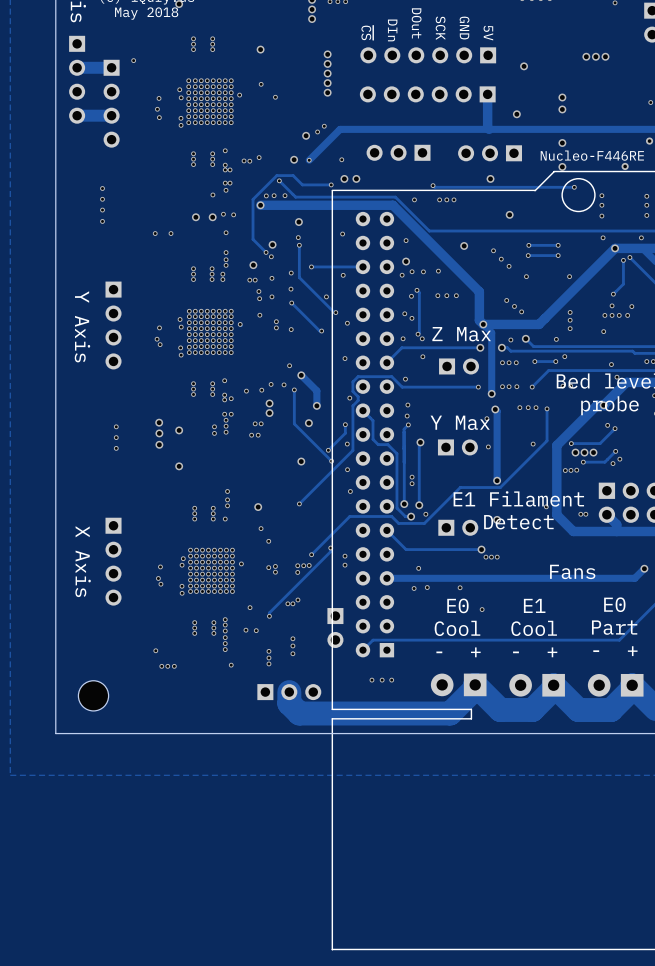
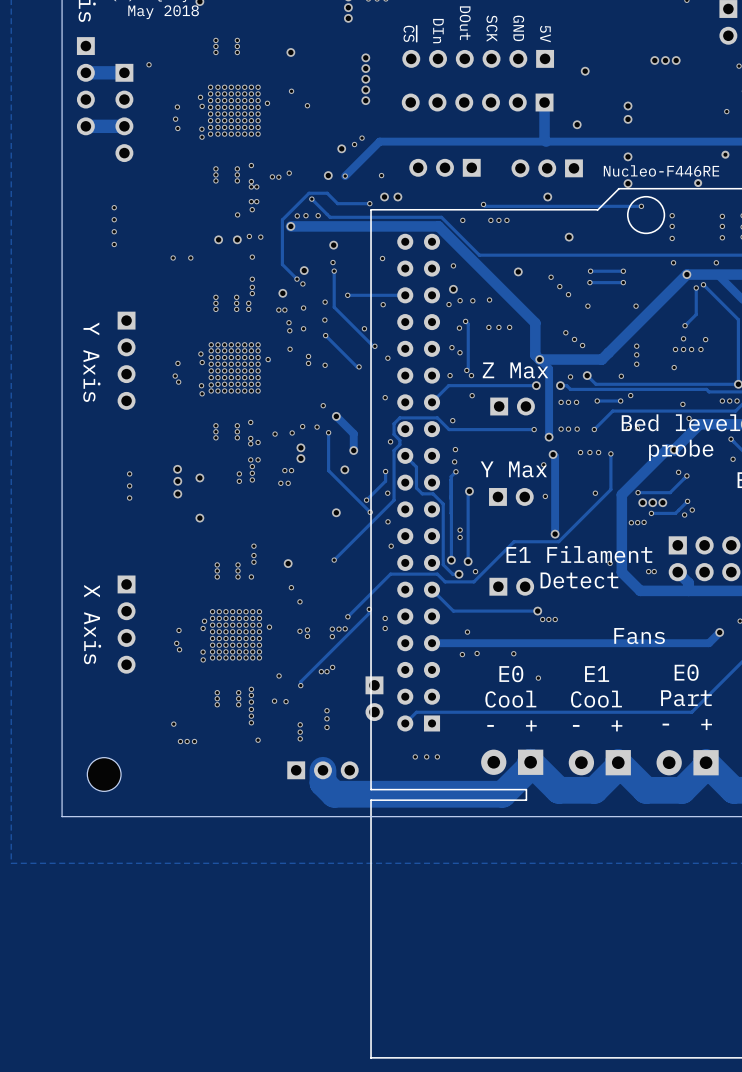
via: (497, 519) -> none

